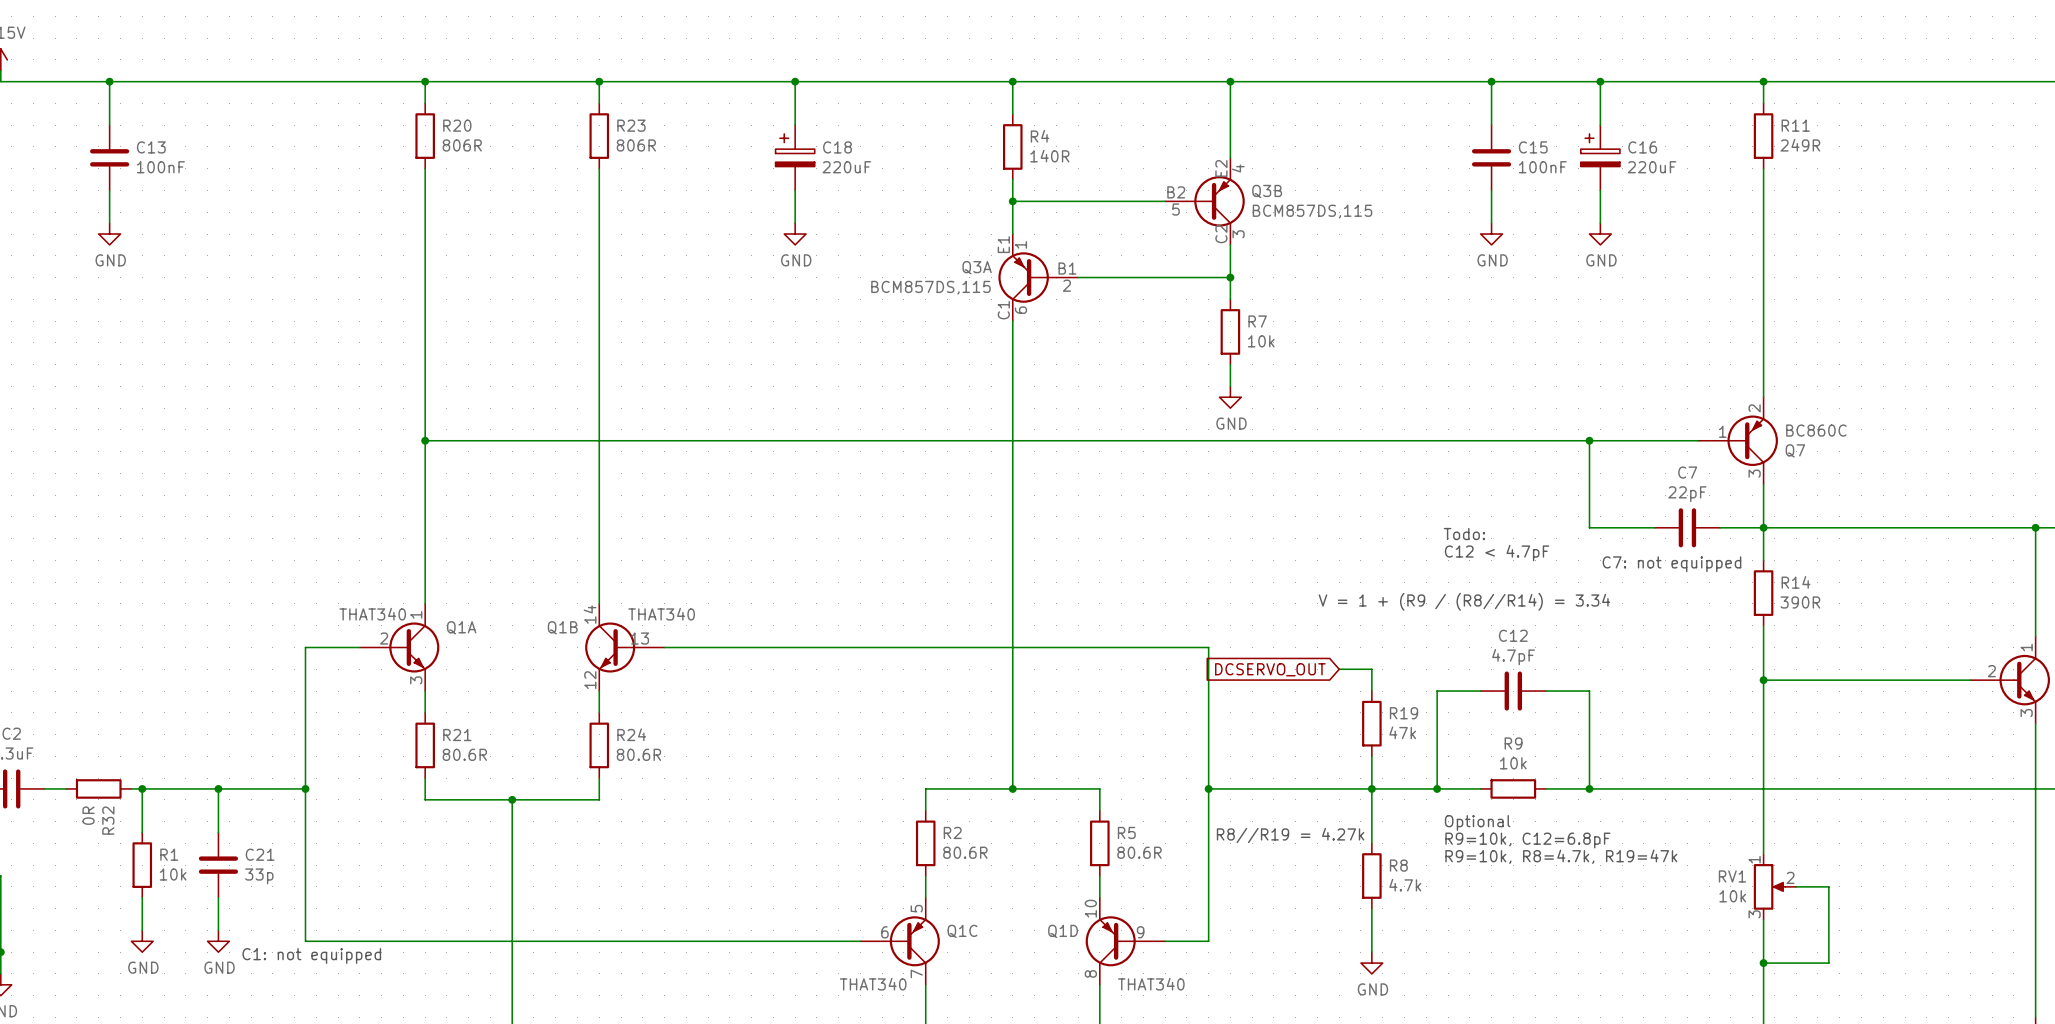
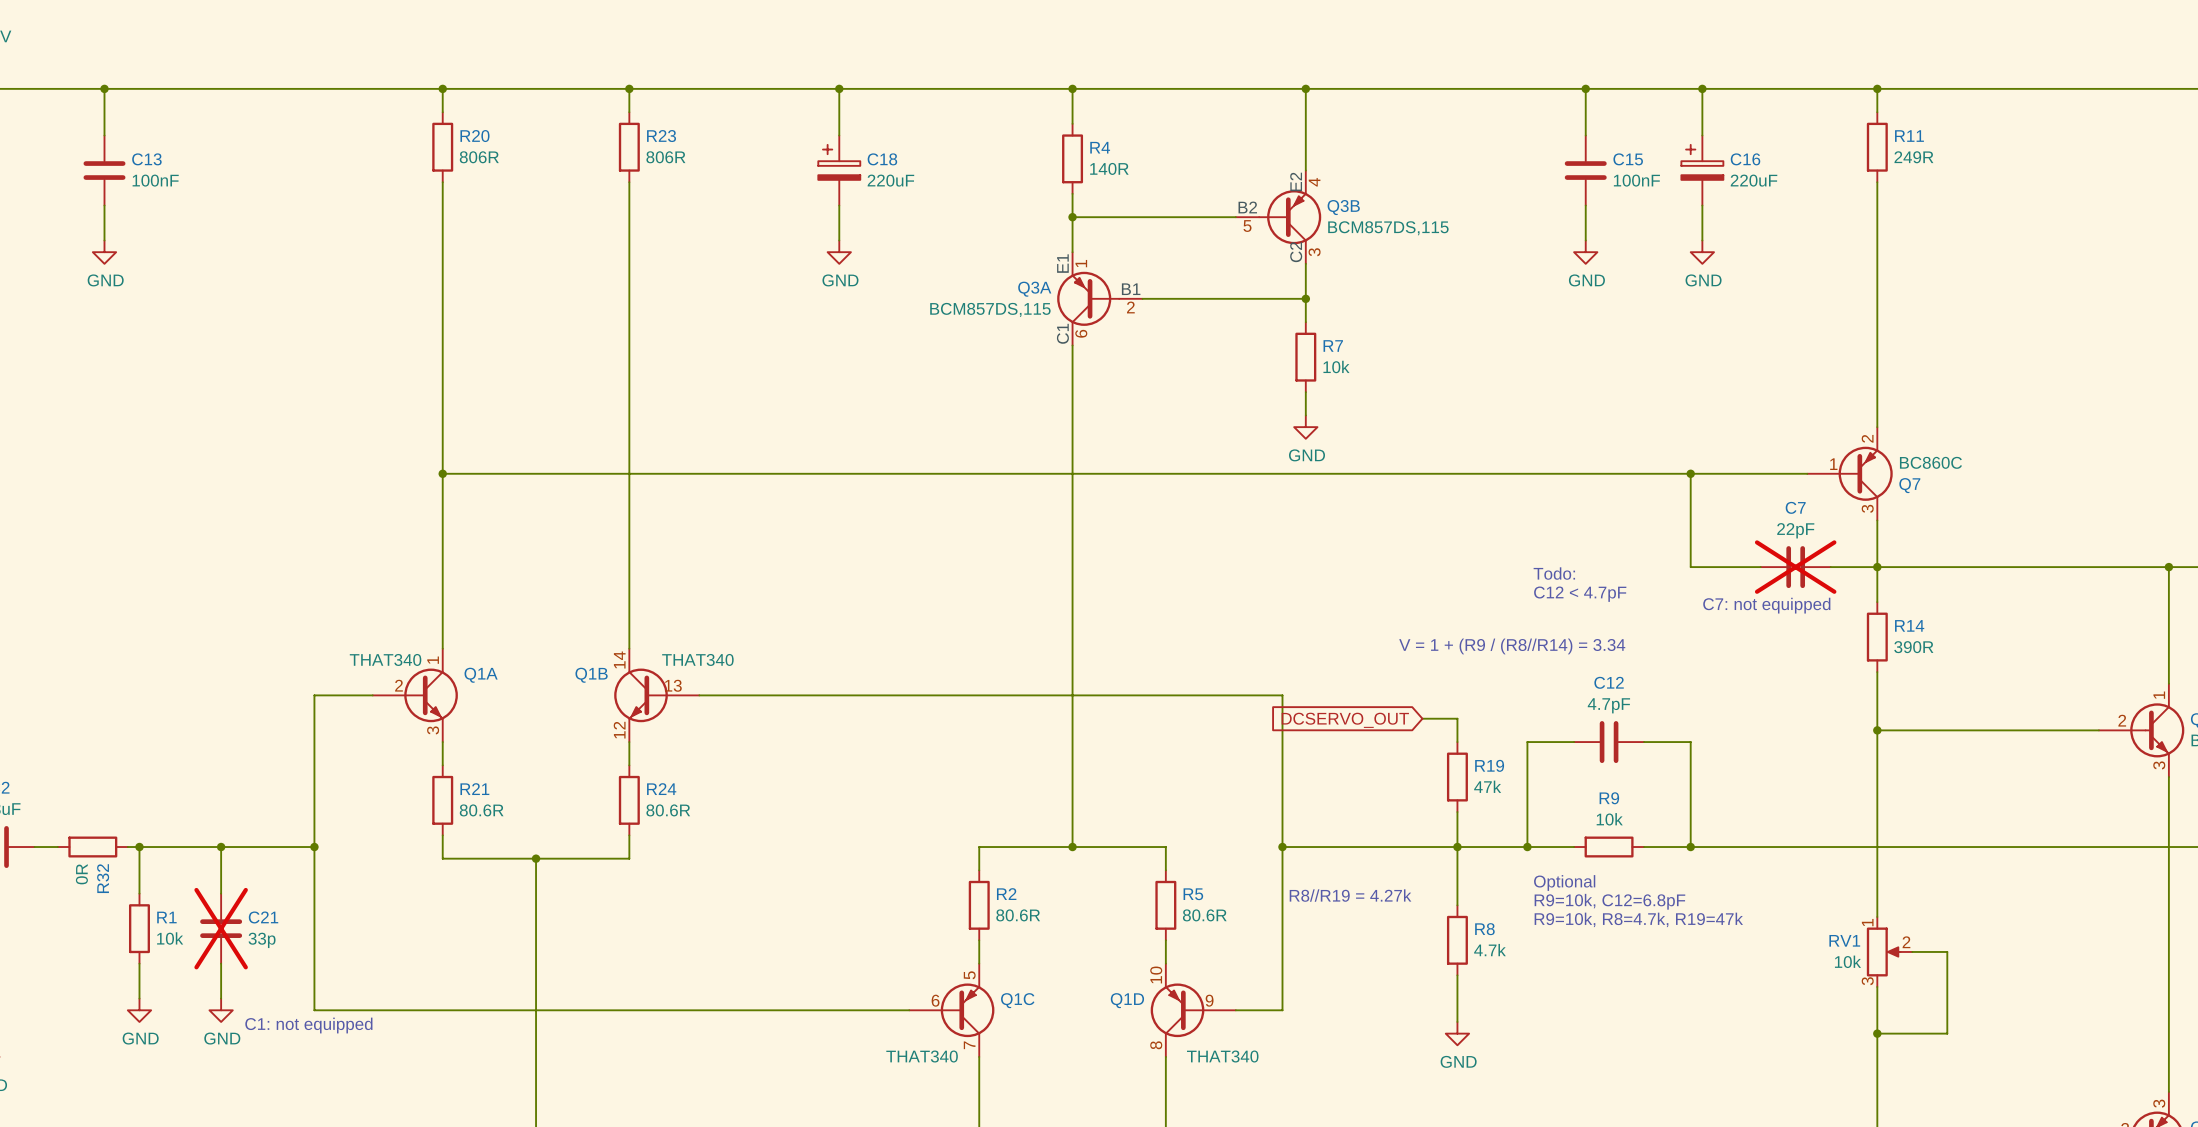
C7 do-not-place cross: none -> (1795, 567)
C21 do-not-place cross: none -> (221, 928)

